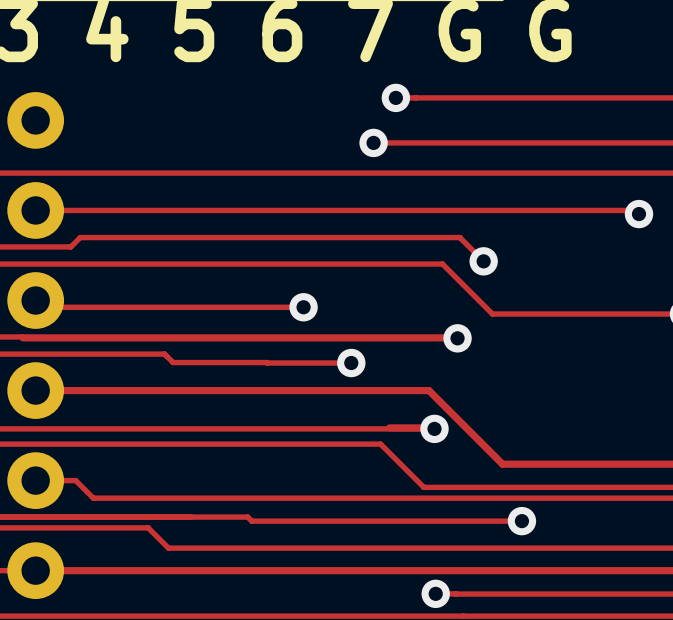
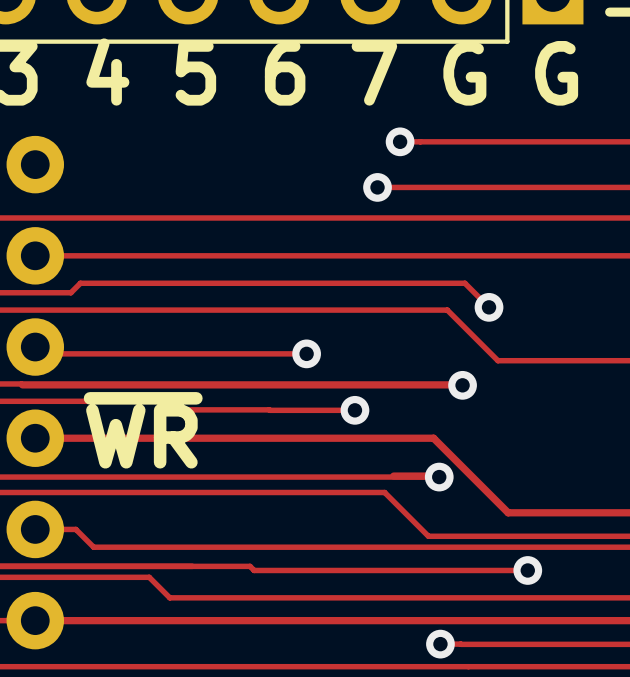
text: none -> ~{WR} (143, 430)

